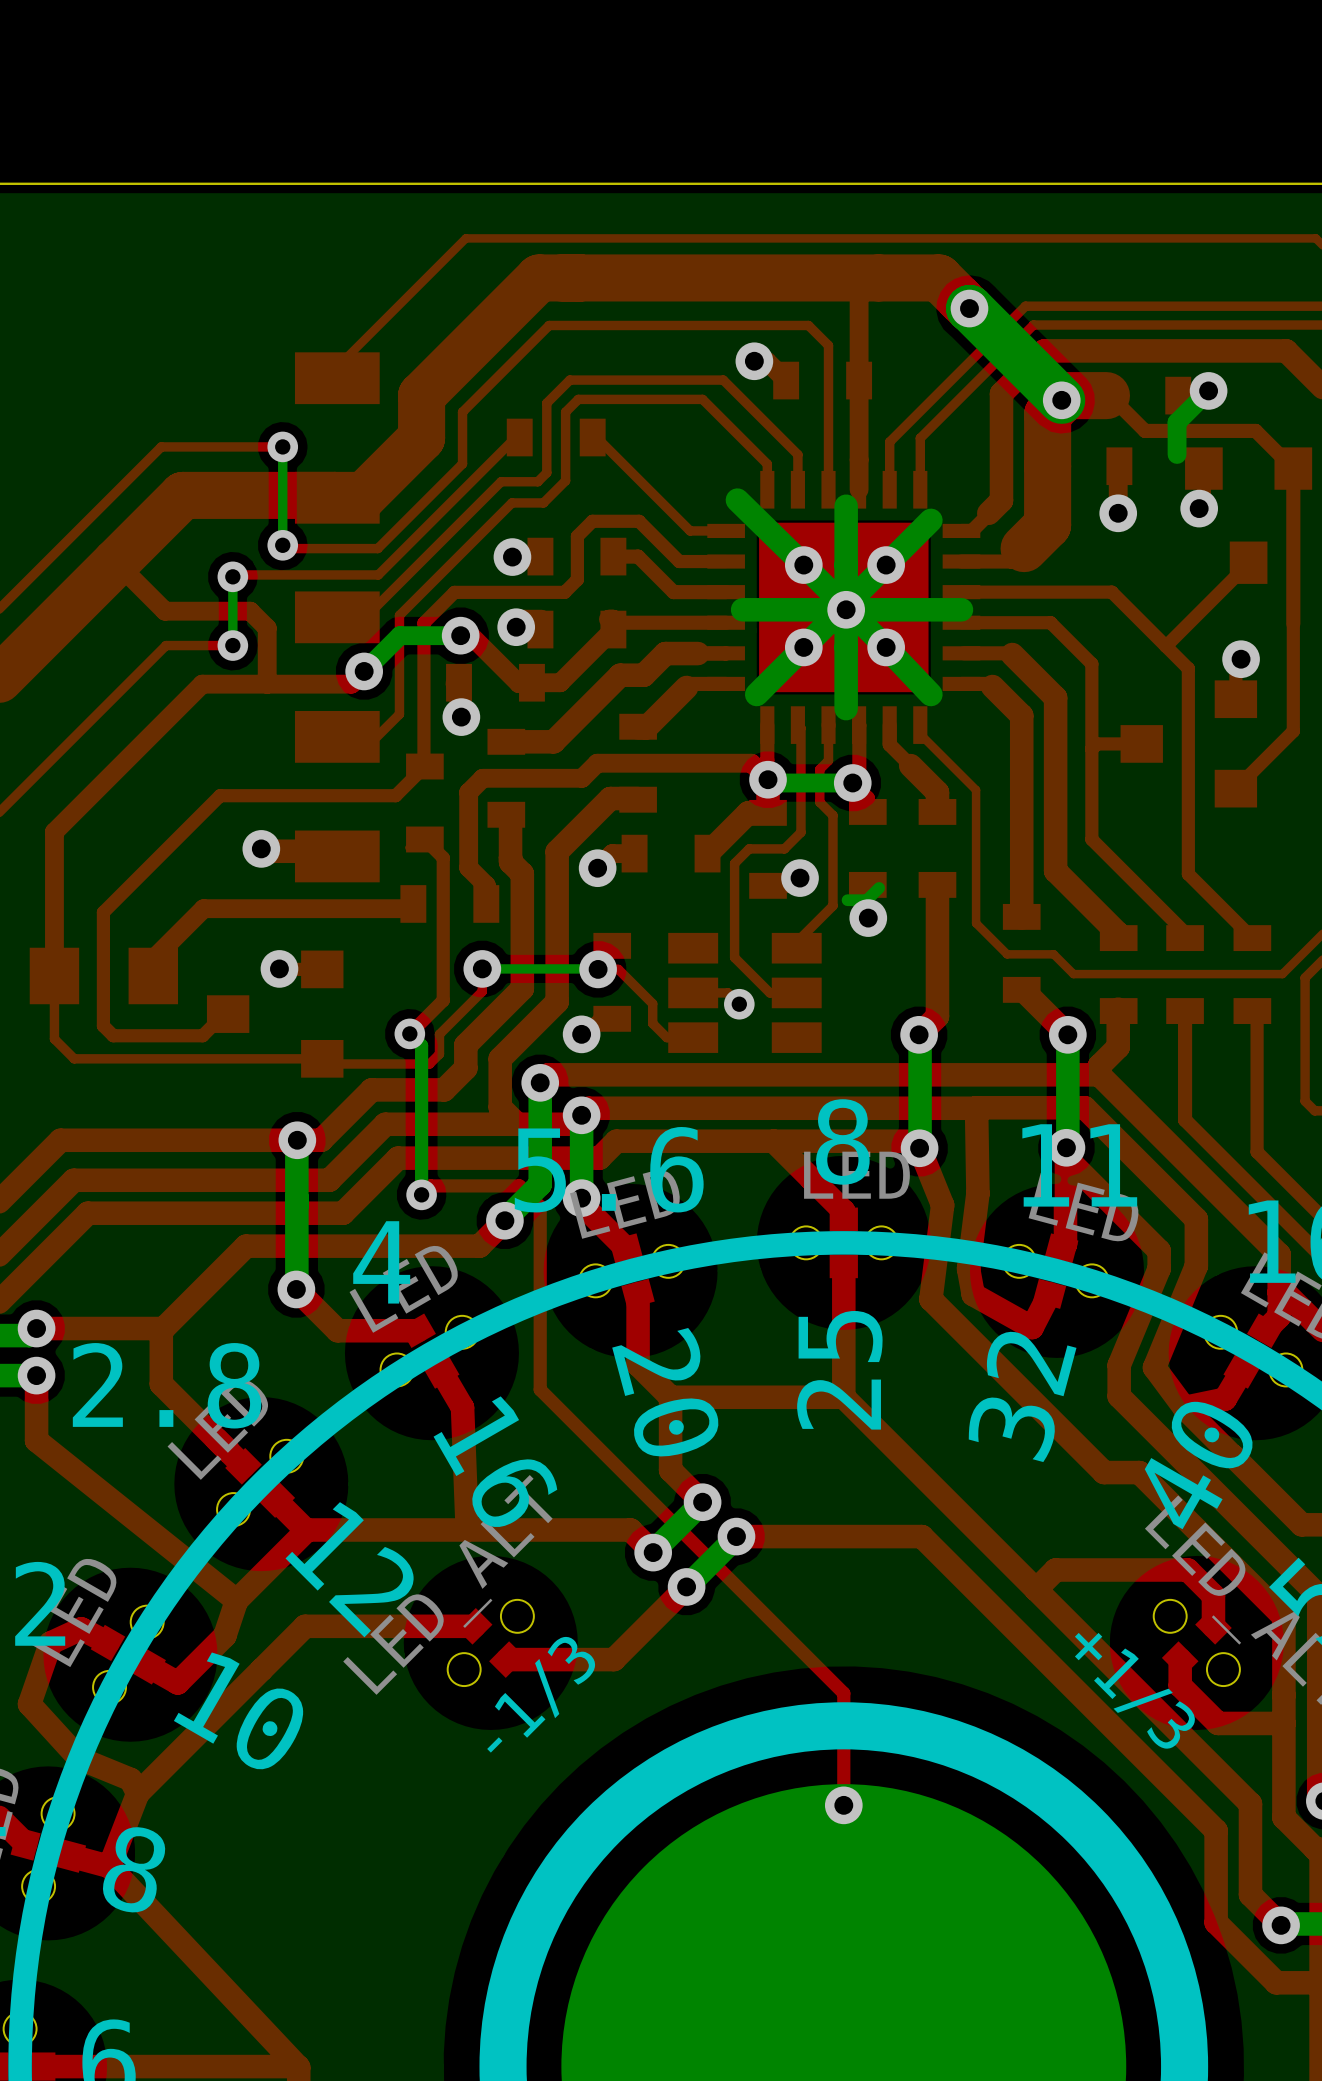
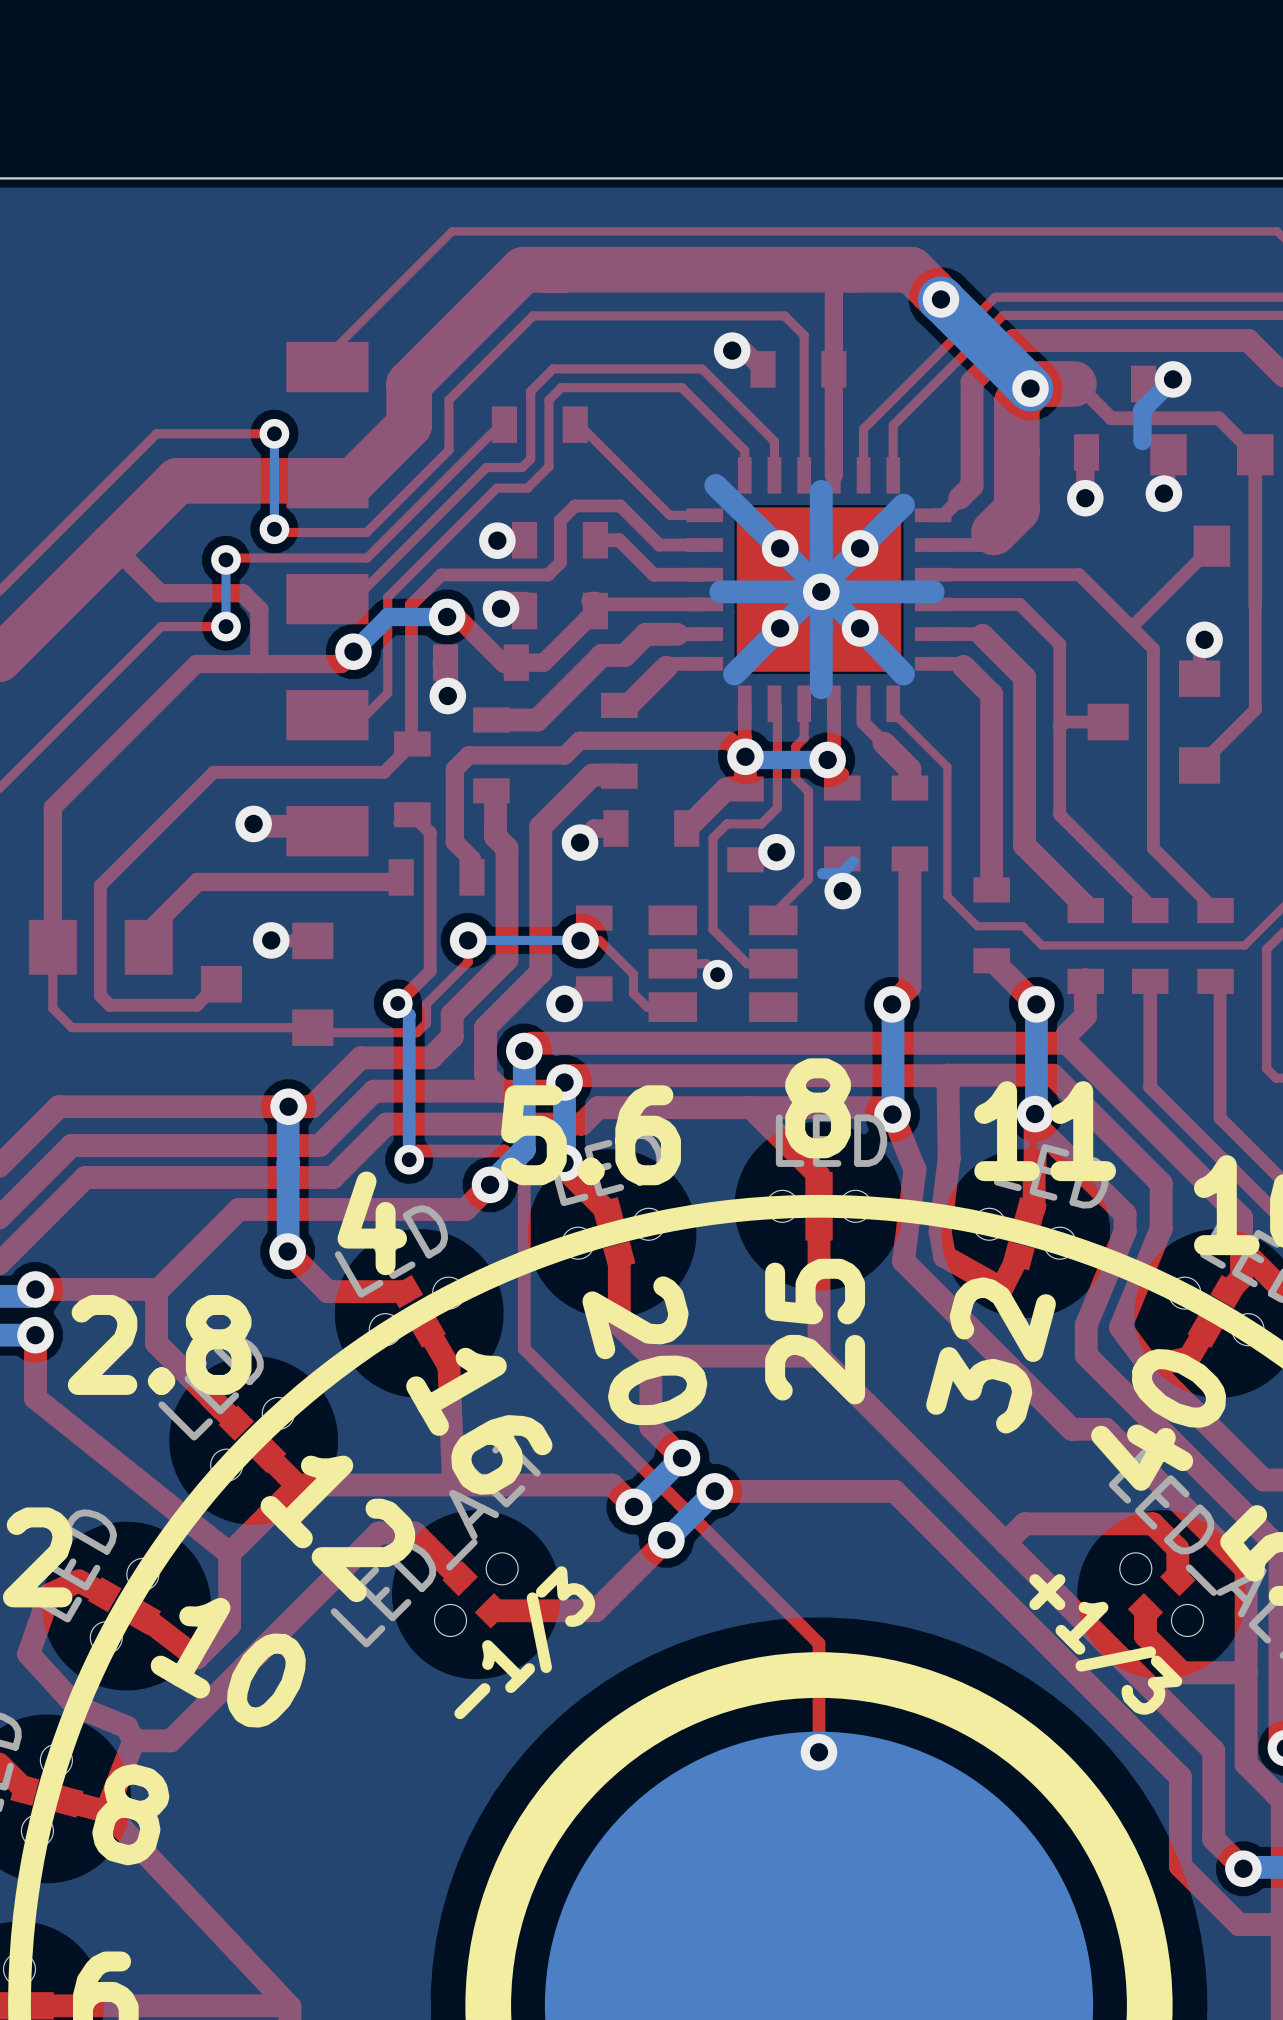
top track: (236, 1600) (224, 1635) (177, 1682) (148, 1666) -> (229, 1553) (229, 1625) (196, 1657) (144, 1617)
top track: (474, 1626) (305, 1626) (137, 1793) -> (460, 1578) (414, 1532) (378, 1532) (170, 1740) (133, 1740)

